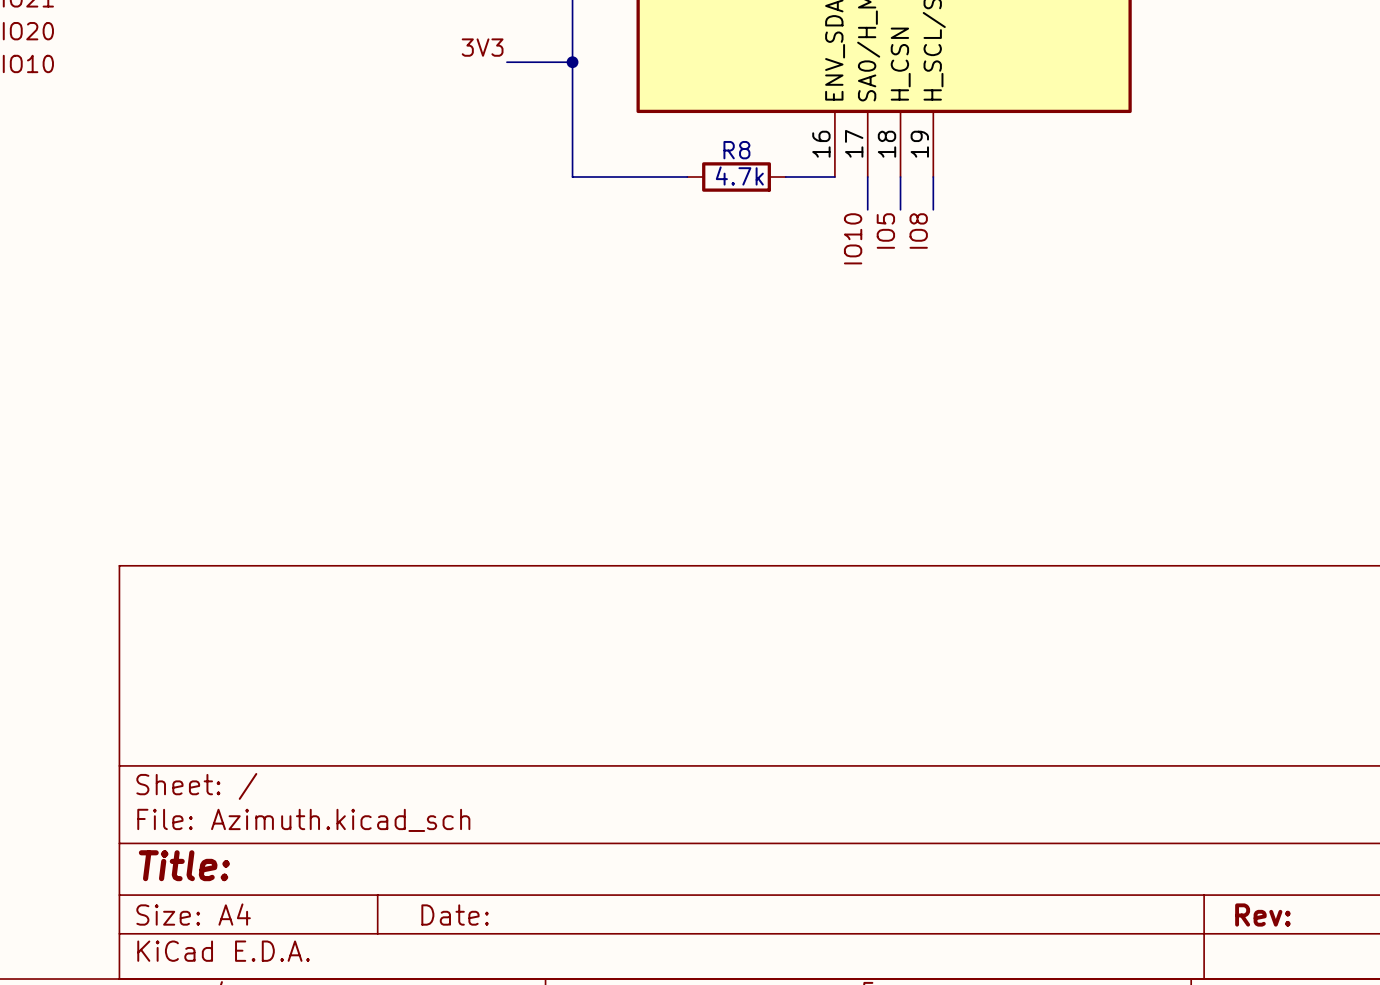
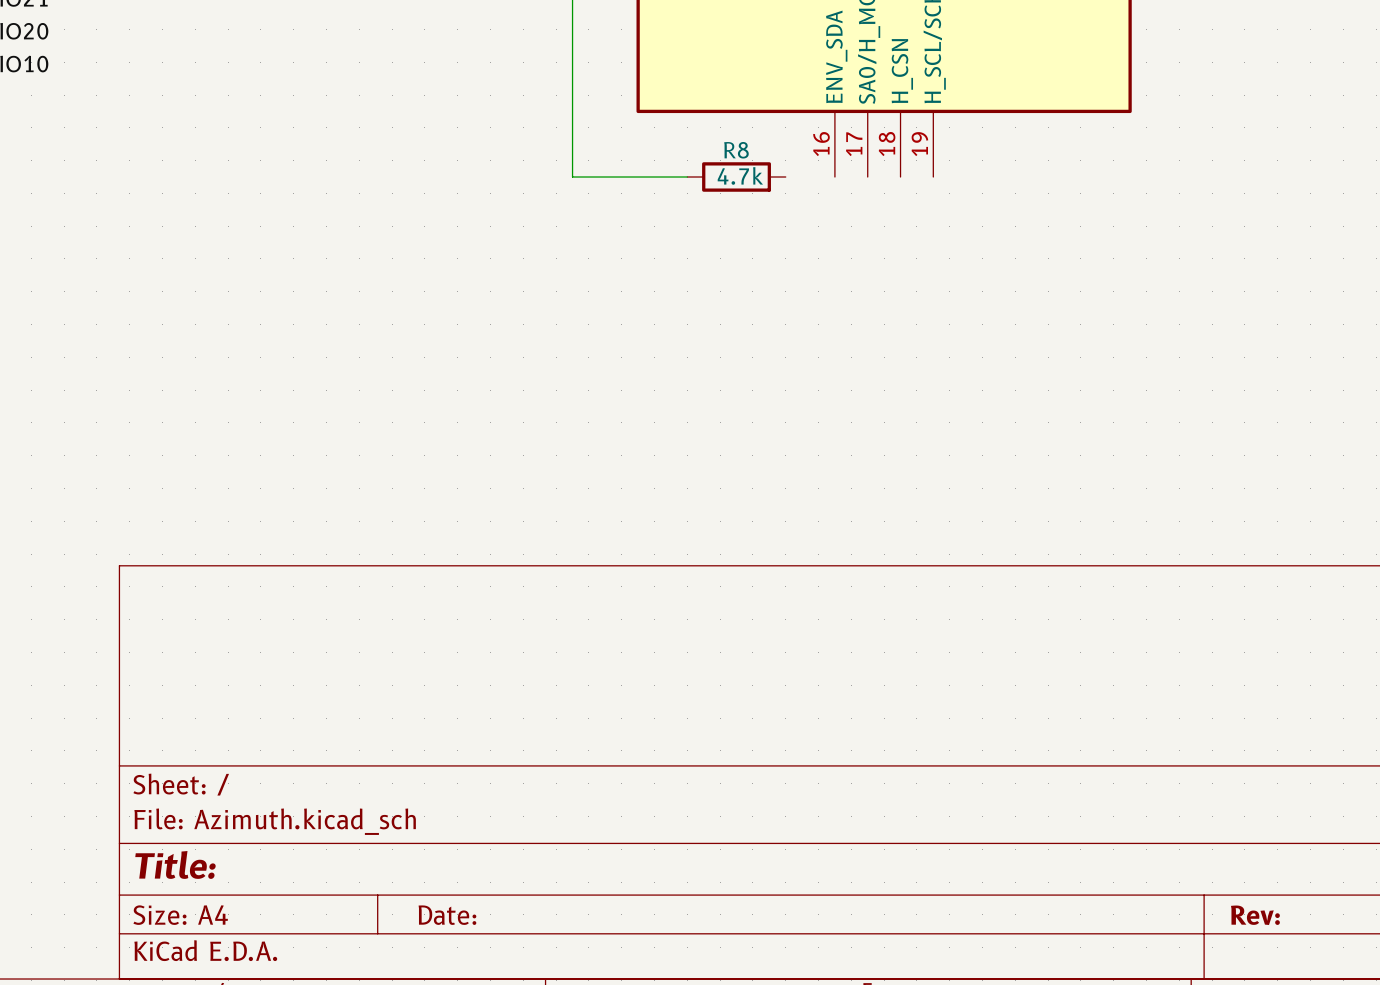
label: 3V3 (482, 47) -> none
wire: (506, 62) (572, 62) -> none
junction: (572, 62) -> none
wire: (785, 177) (834, 177) -> none
wire: (867, 177) (867, 209) -> none
wire: (900, 177) (900, 209) -> none
wire: (933, 177) (933, 209) -> none
label: IO5 (885, 231) -> none
label: IO8 (918, 231) -> none
label: IO10 (853, 238) -> none

